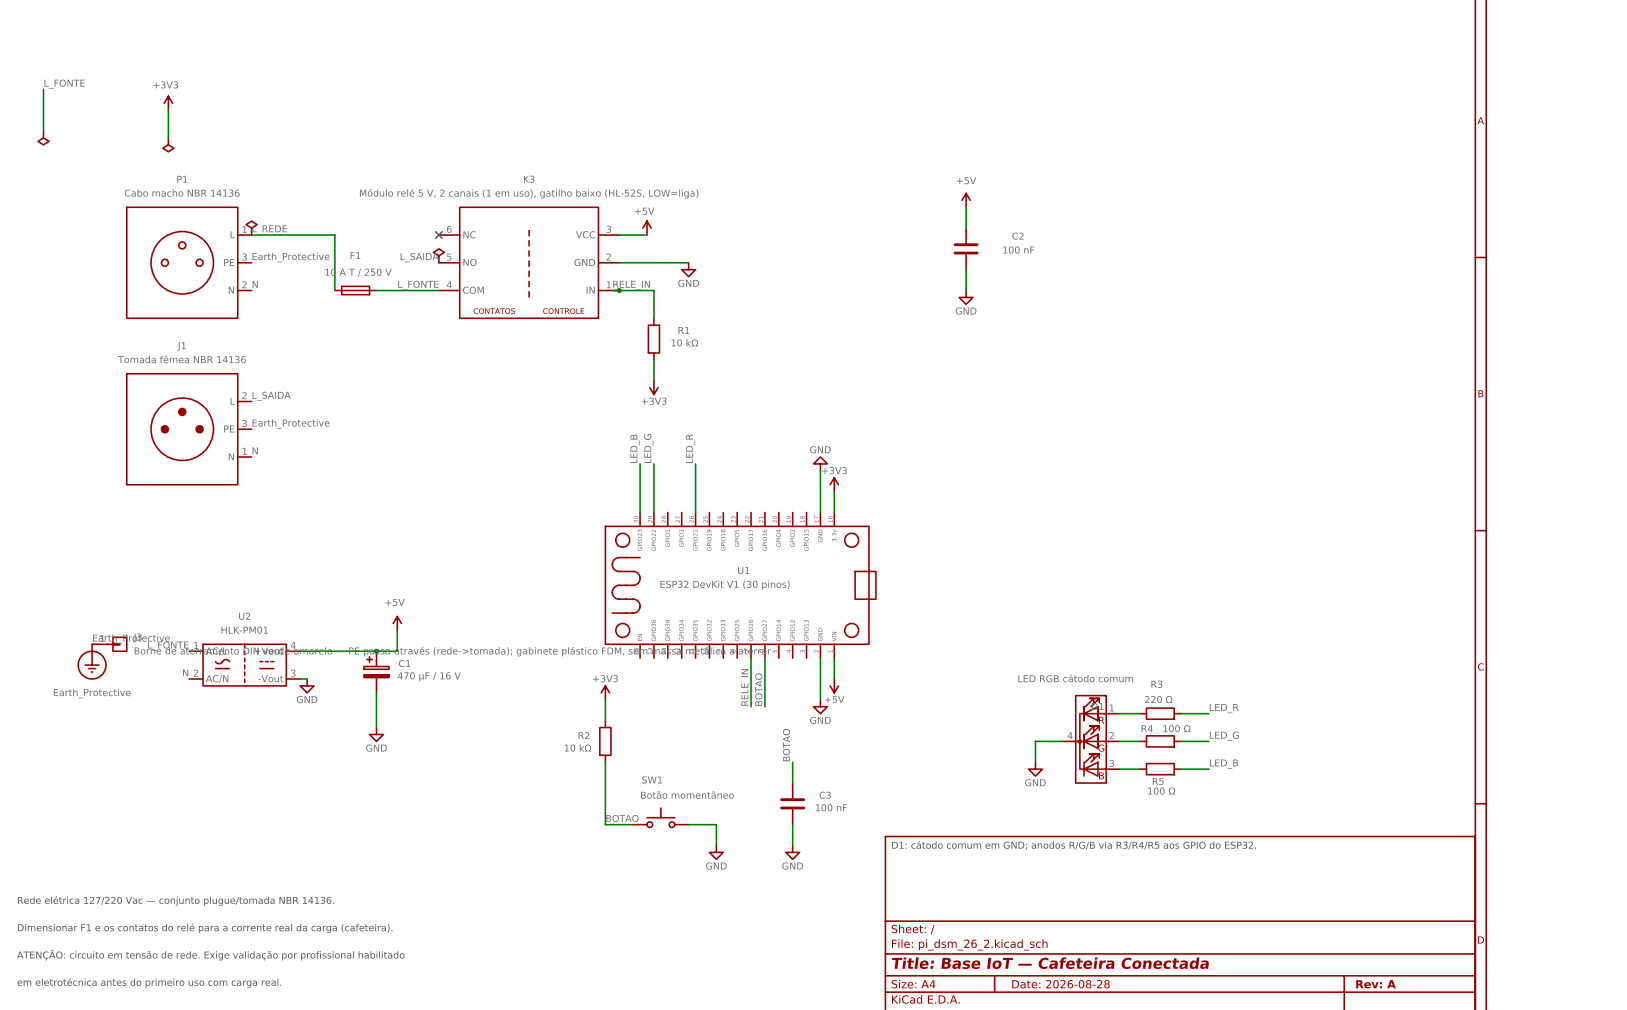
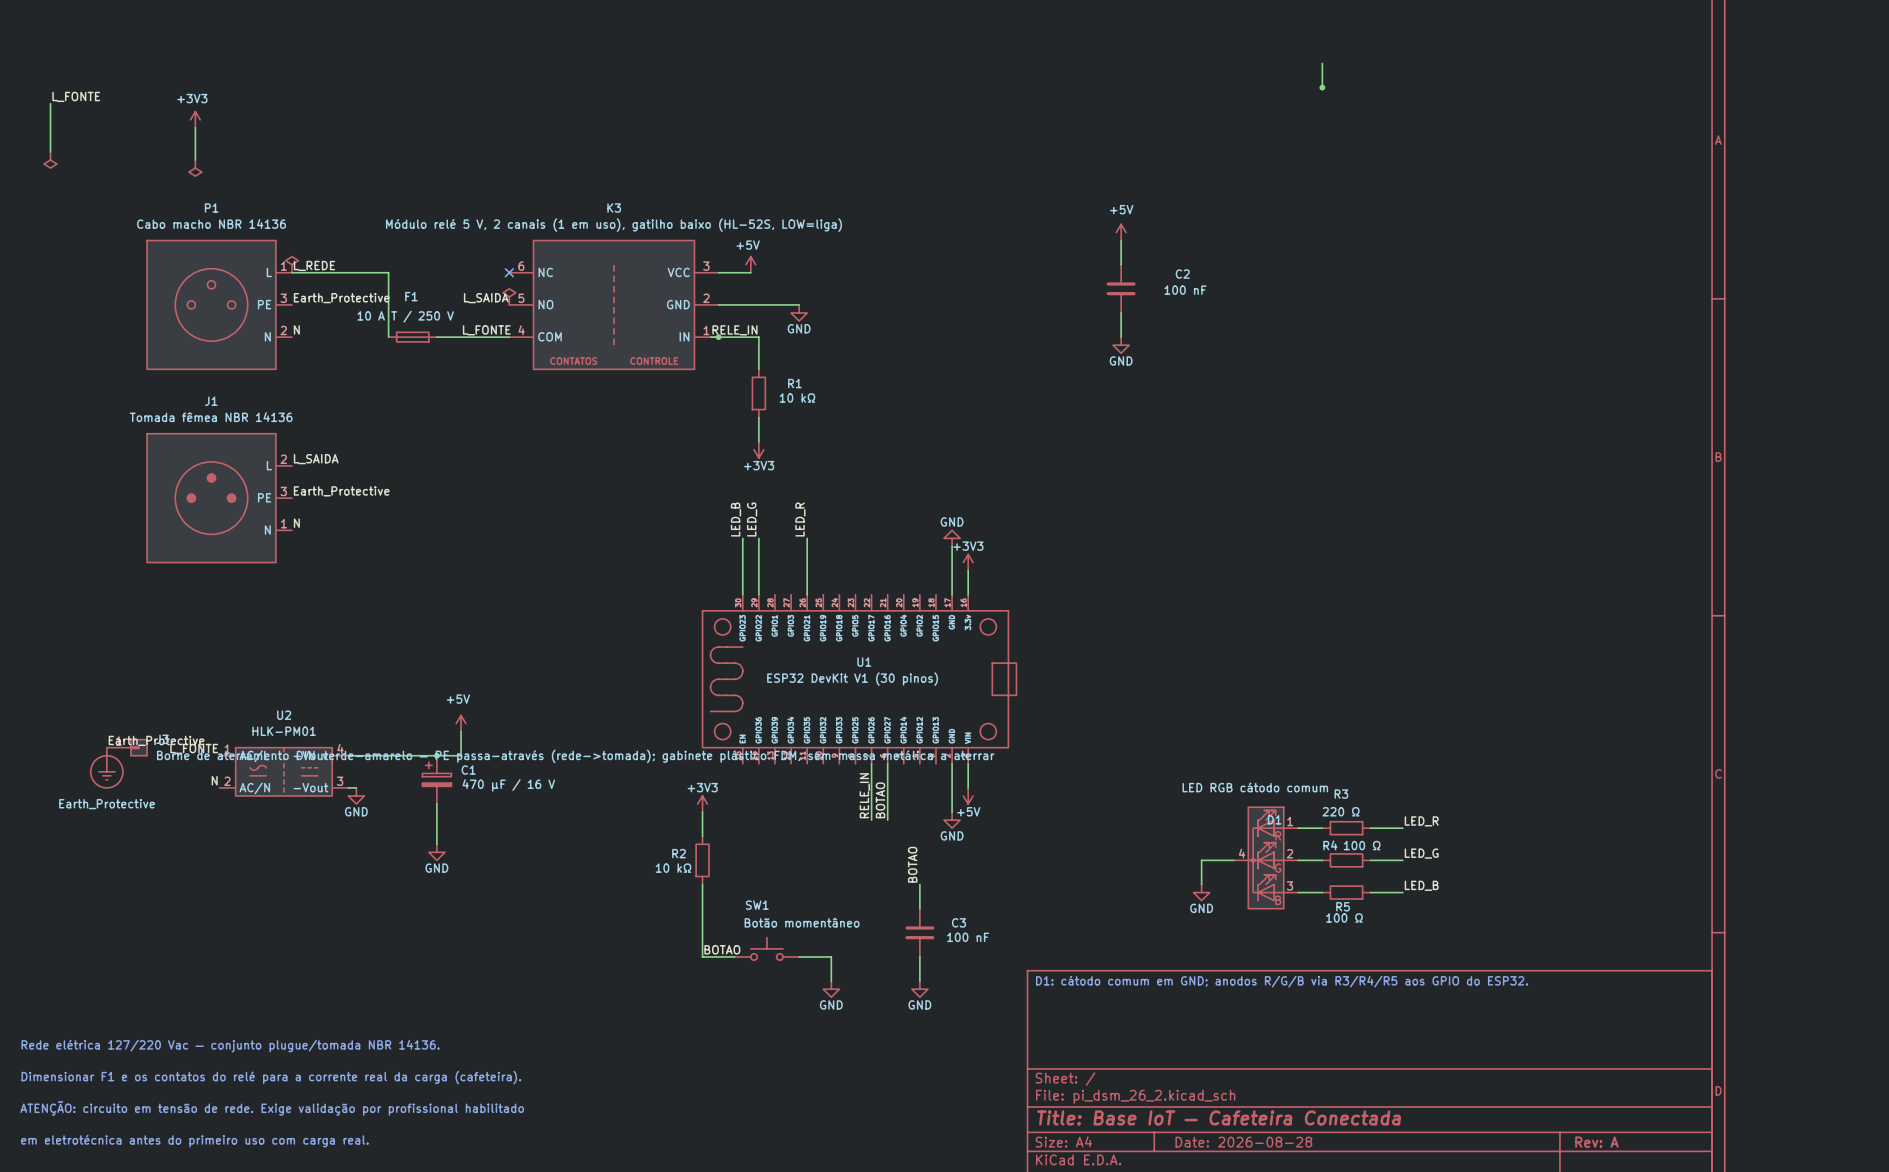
wire: none -> (1322, 63) (1322, 87)
junction: none -> (1322, 87)

